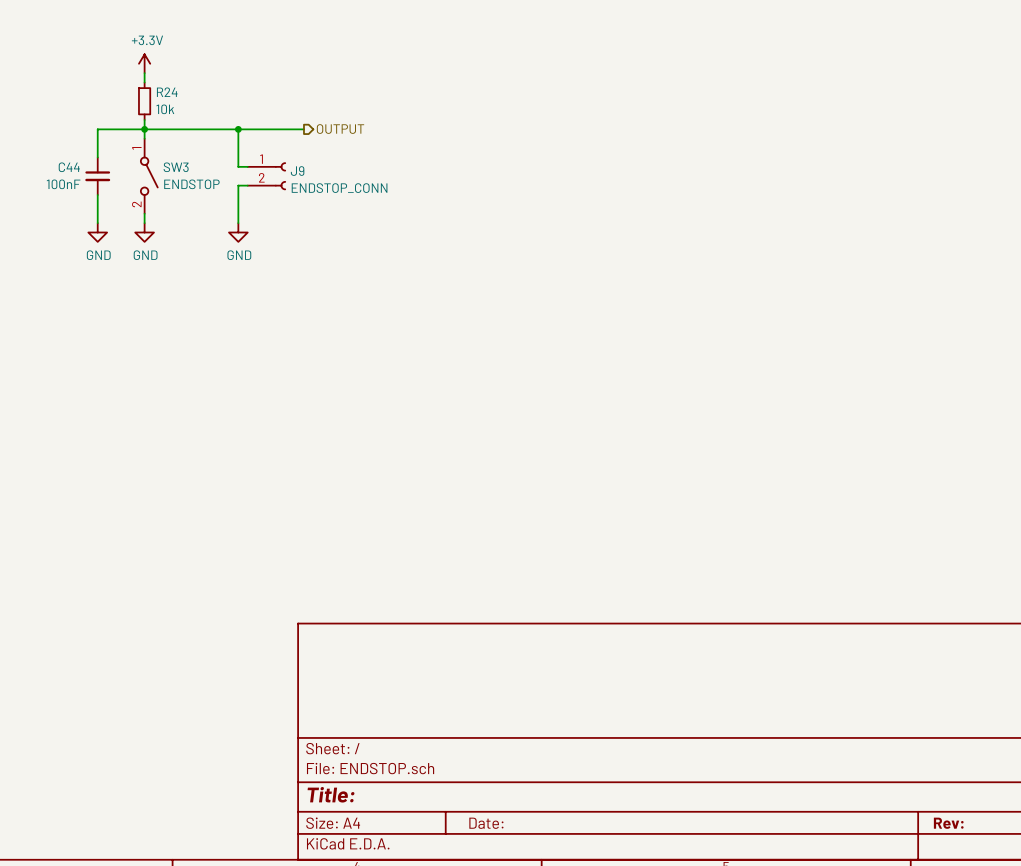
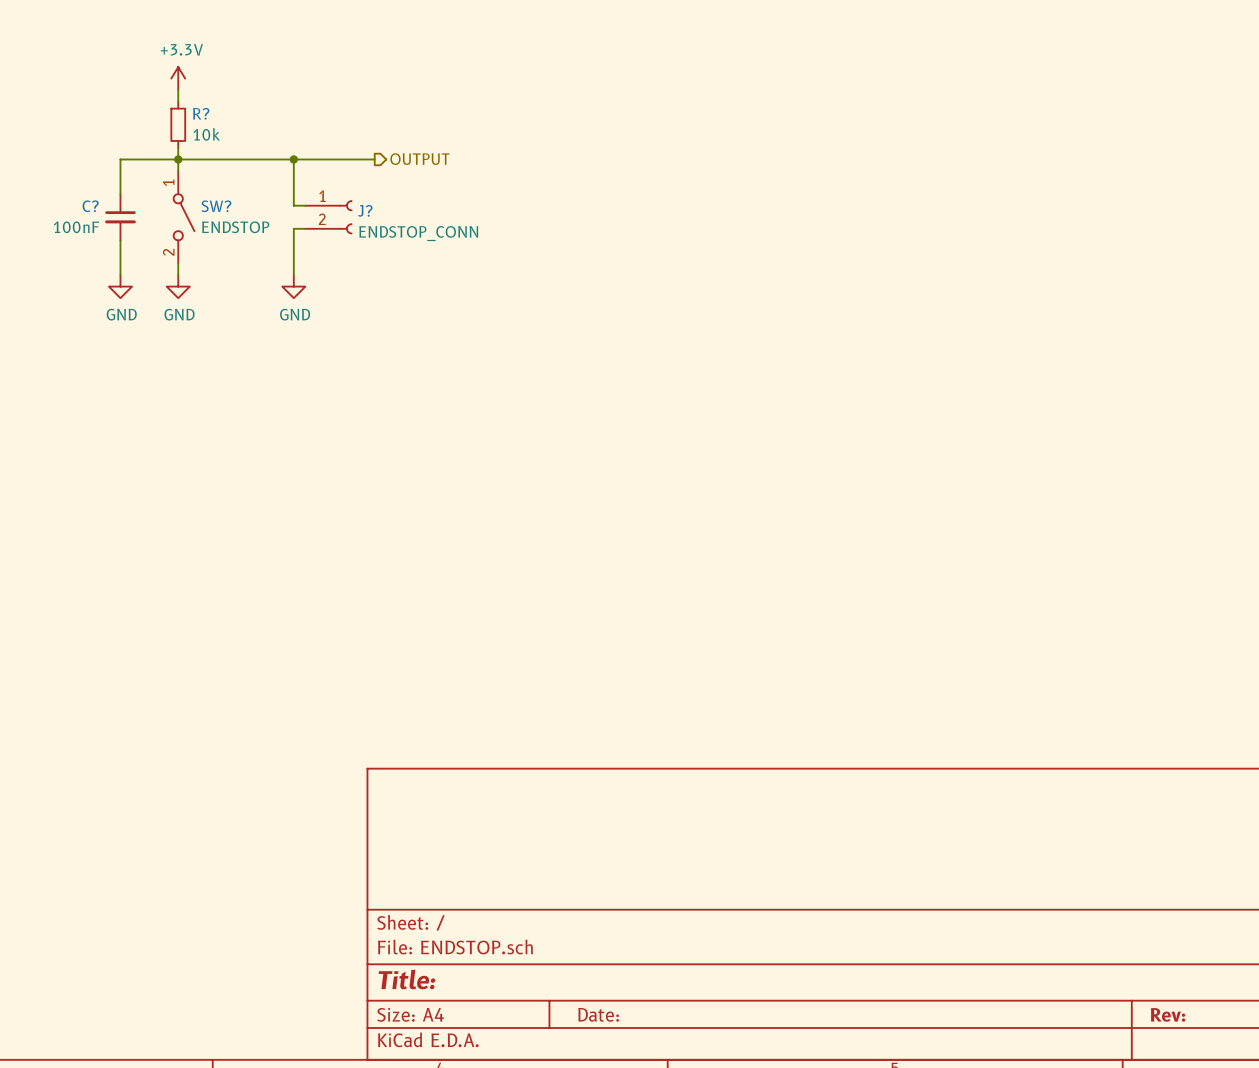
R24 name: R24 (167, 92) -> R? (201, 113)
C44 name: C44 (69, 167) -> C? (90, 206)
SW3 name: SW3 (176, 167) -> SW? (216, 206)
J9 name: J9 (297, 171) -> J? (365, 210)

